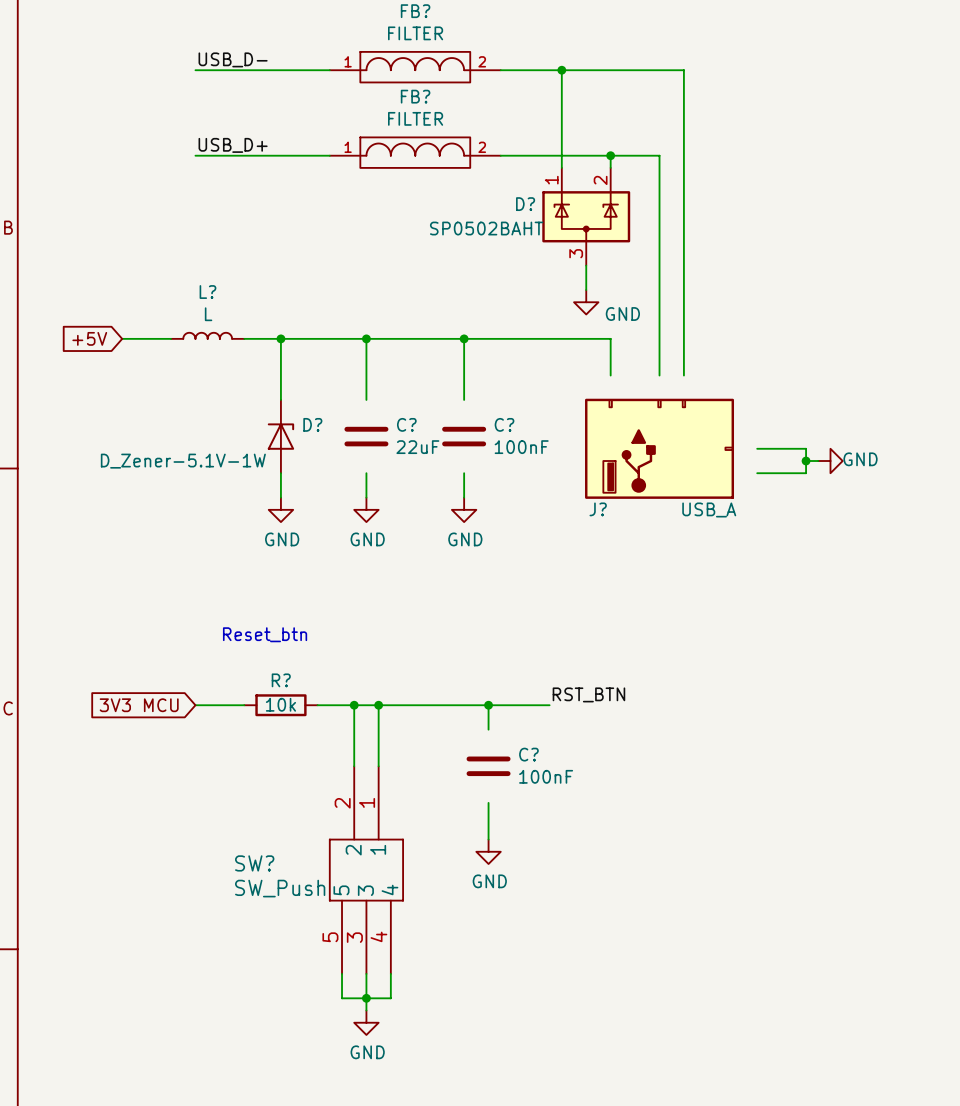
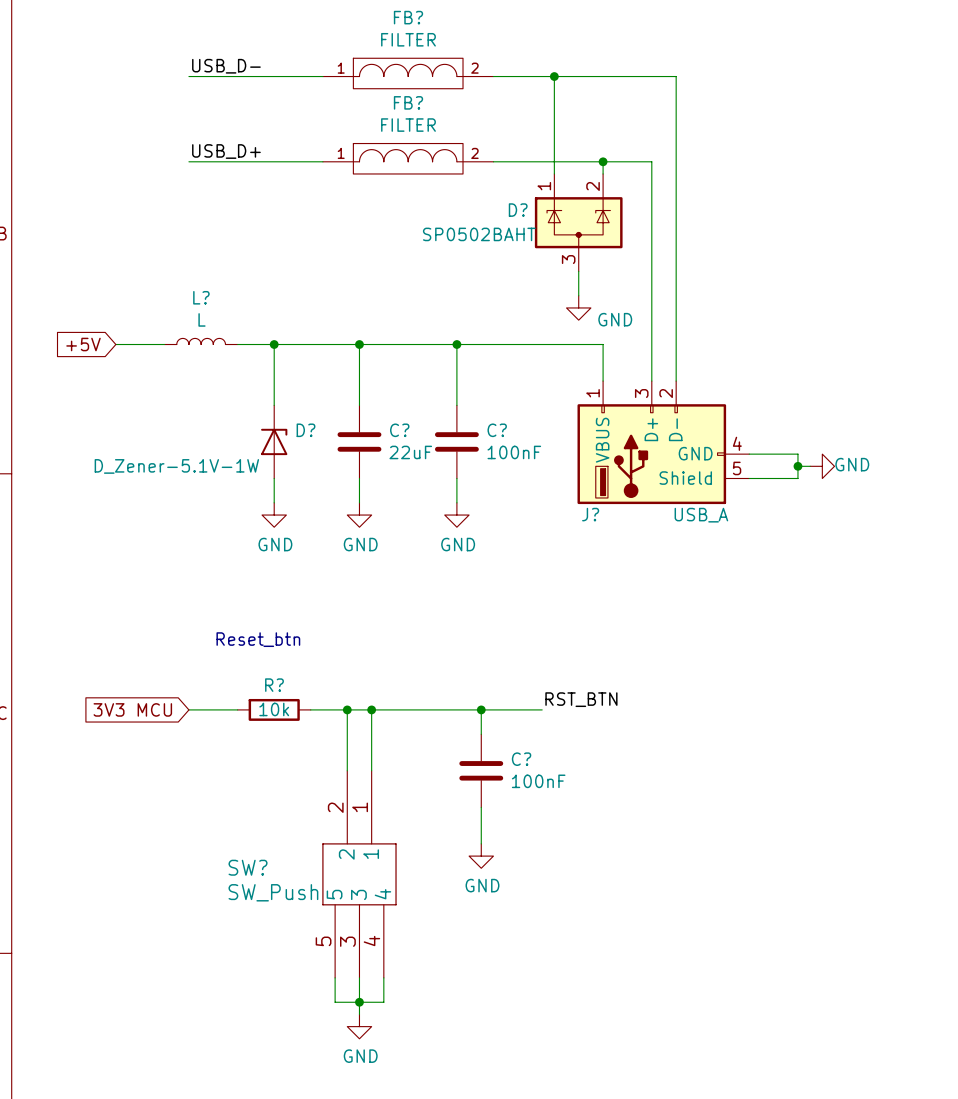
C? symbol: [344, 426, 389, 447] -> [337, 405, 382, 479]
C? symbol: [442, 426, 487, 447] -> [434, 405, 479, 479]
J?: none -> USB_A (663, 442)
J?: USB_A (659, 448) -> none
C? symbol: [466, 756, 511, 777] -> [459, 734, 504, 808]

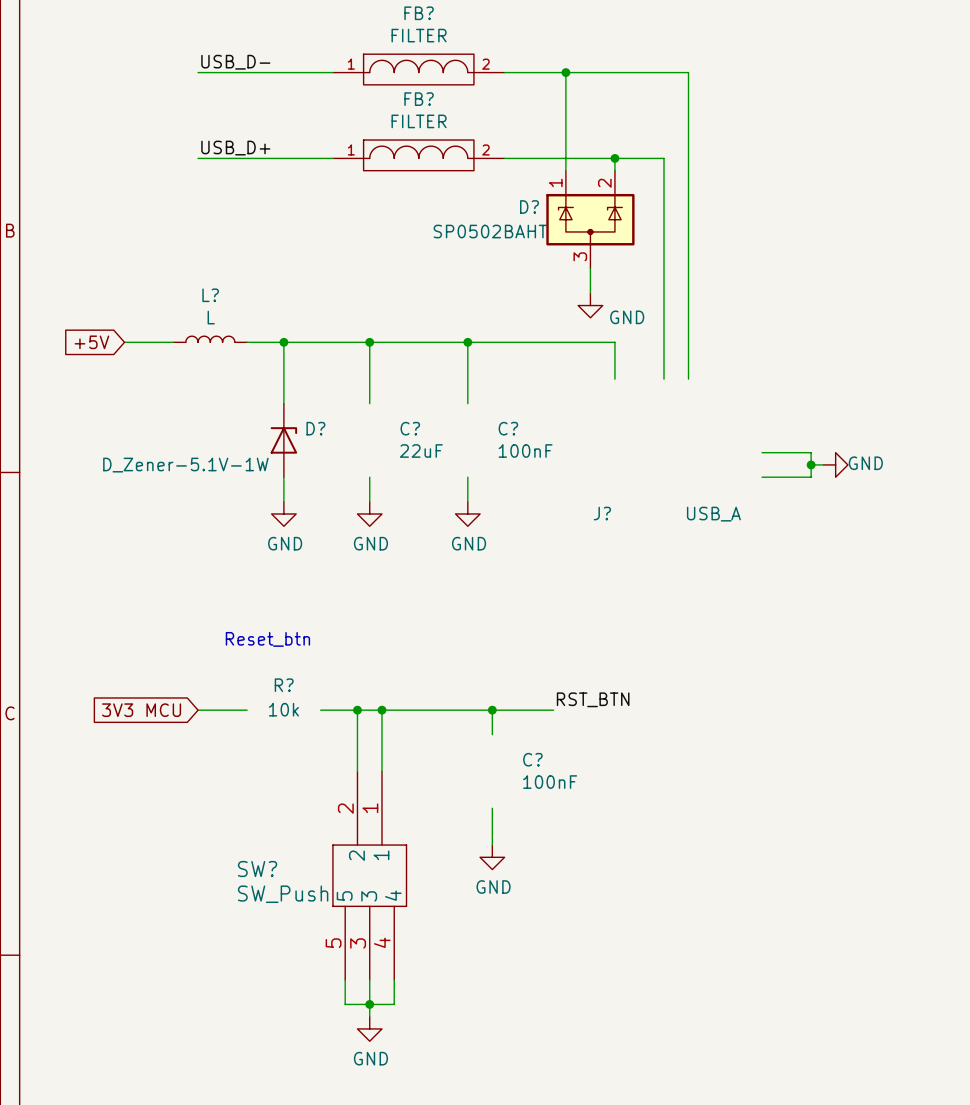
C?: 22uF (359, 441) -> none
C?: 100nF (456, 441) -> none
J?: USB_A (663, 442) -> none
R?: none -> 10k (283, 697)
R?: 10k (274, 709) -> none
C?: 100nF (481, 770) -> none

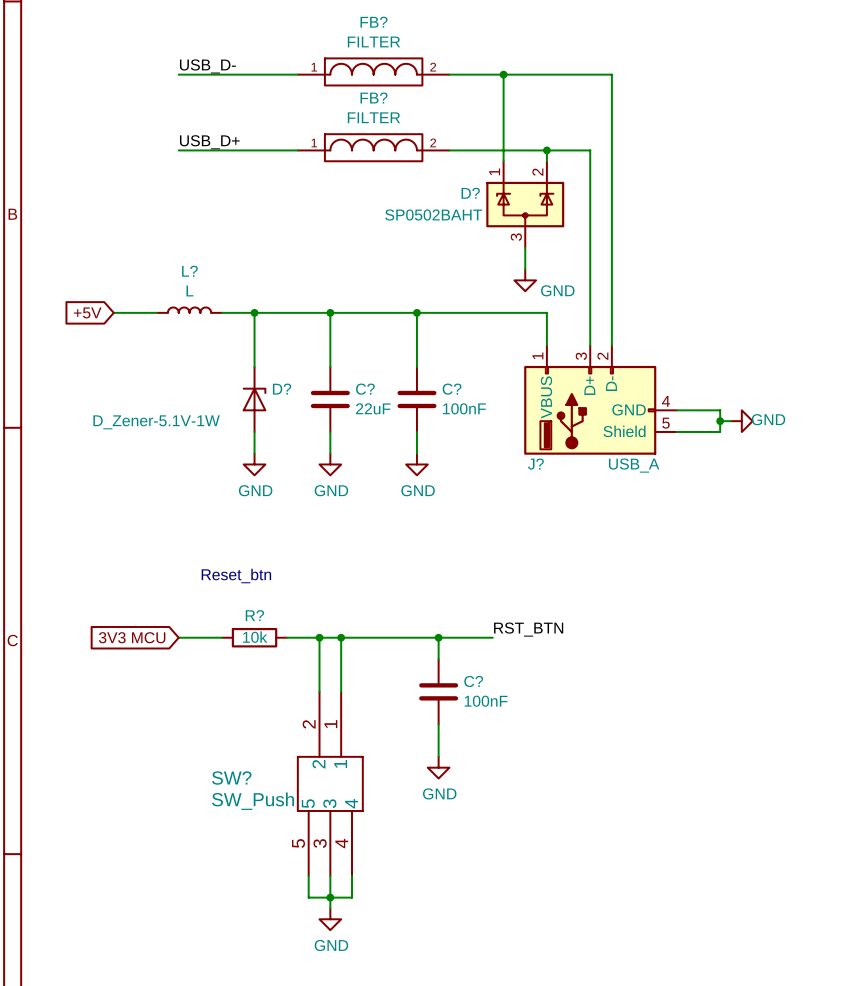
C?: none -> 22uF (330, 399)
C?: none -> 100nF (416, 399)
J?: none -> USB_A (600, 400)
R?: 10k (283, 697) -> none
R?: none -> 10k (254, 637)
C?: none -> 100nF (438, 691)

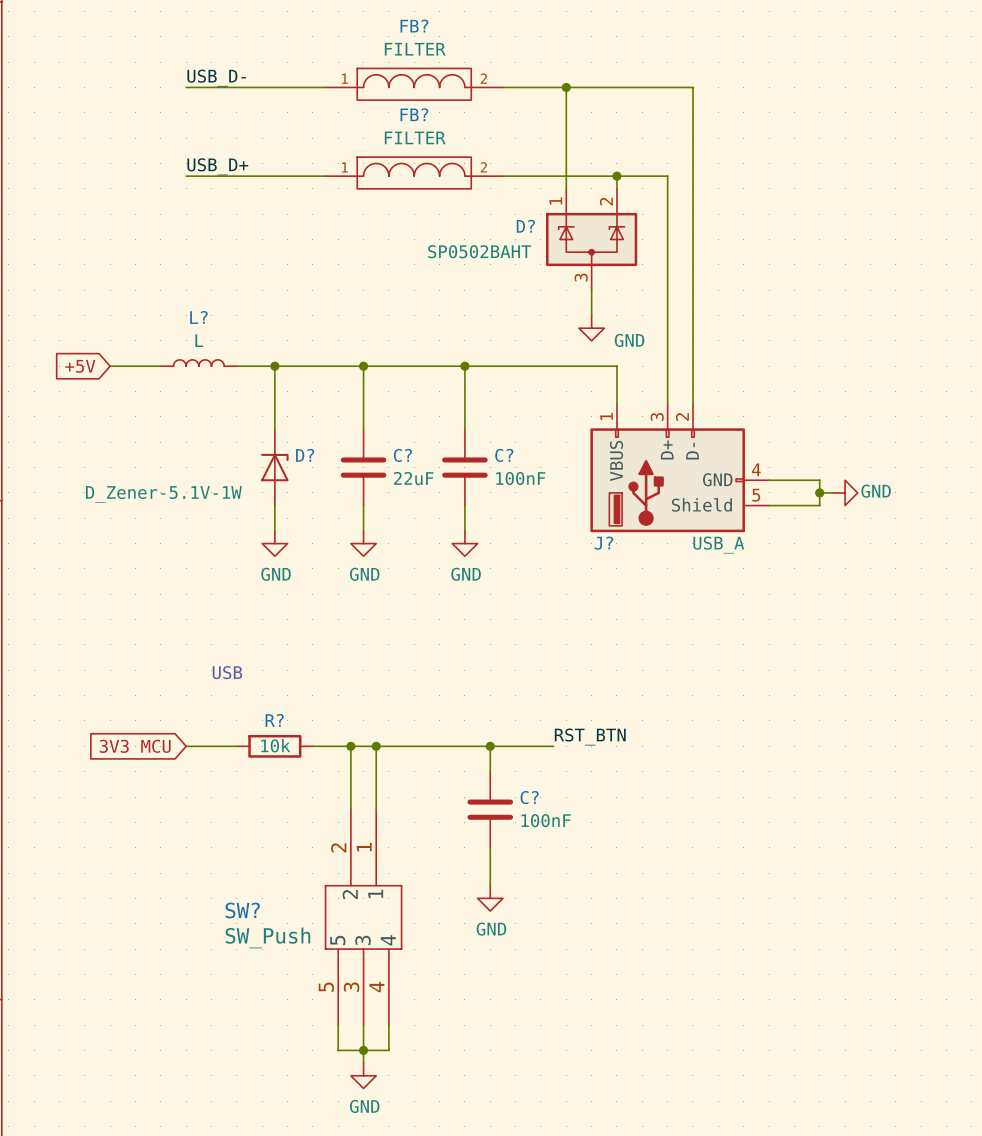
text: Reset_btn (236, 575) -> USB (227, 672)

